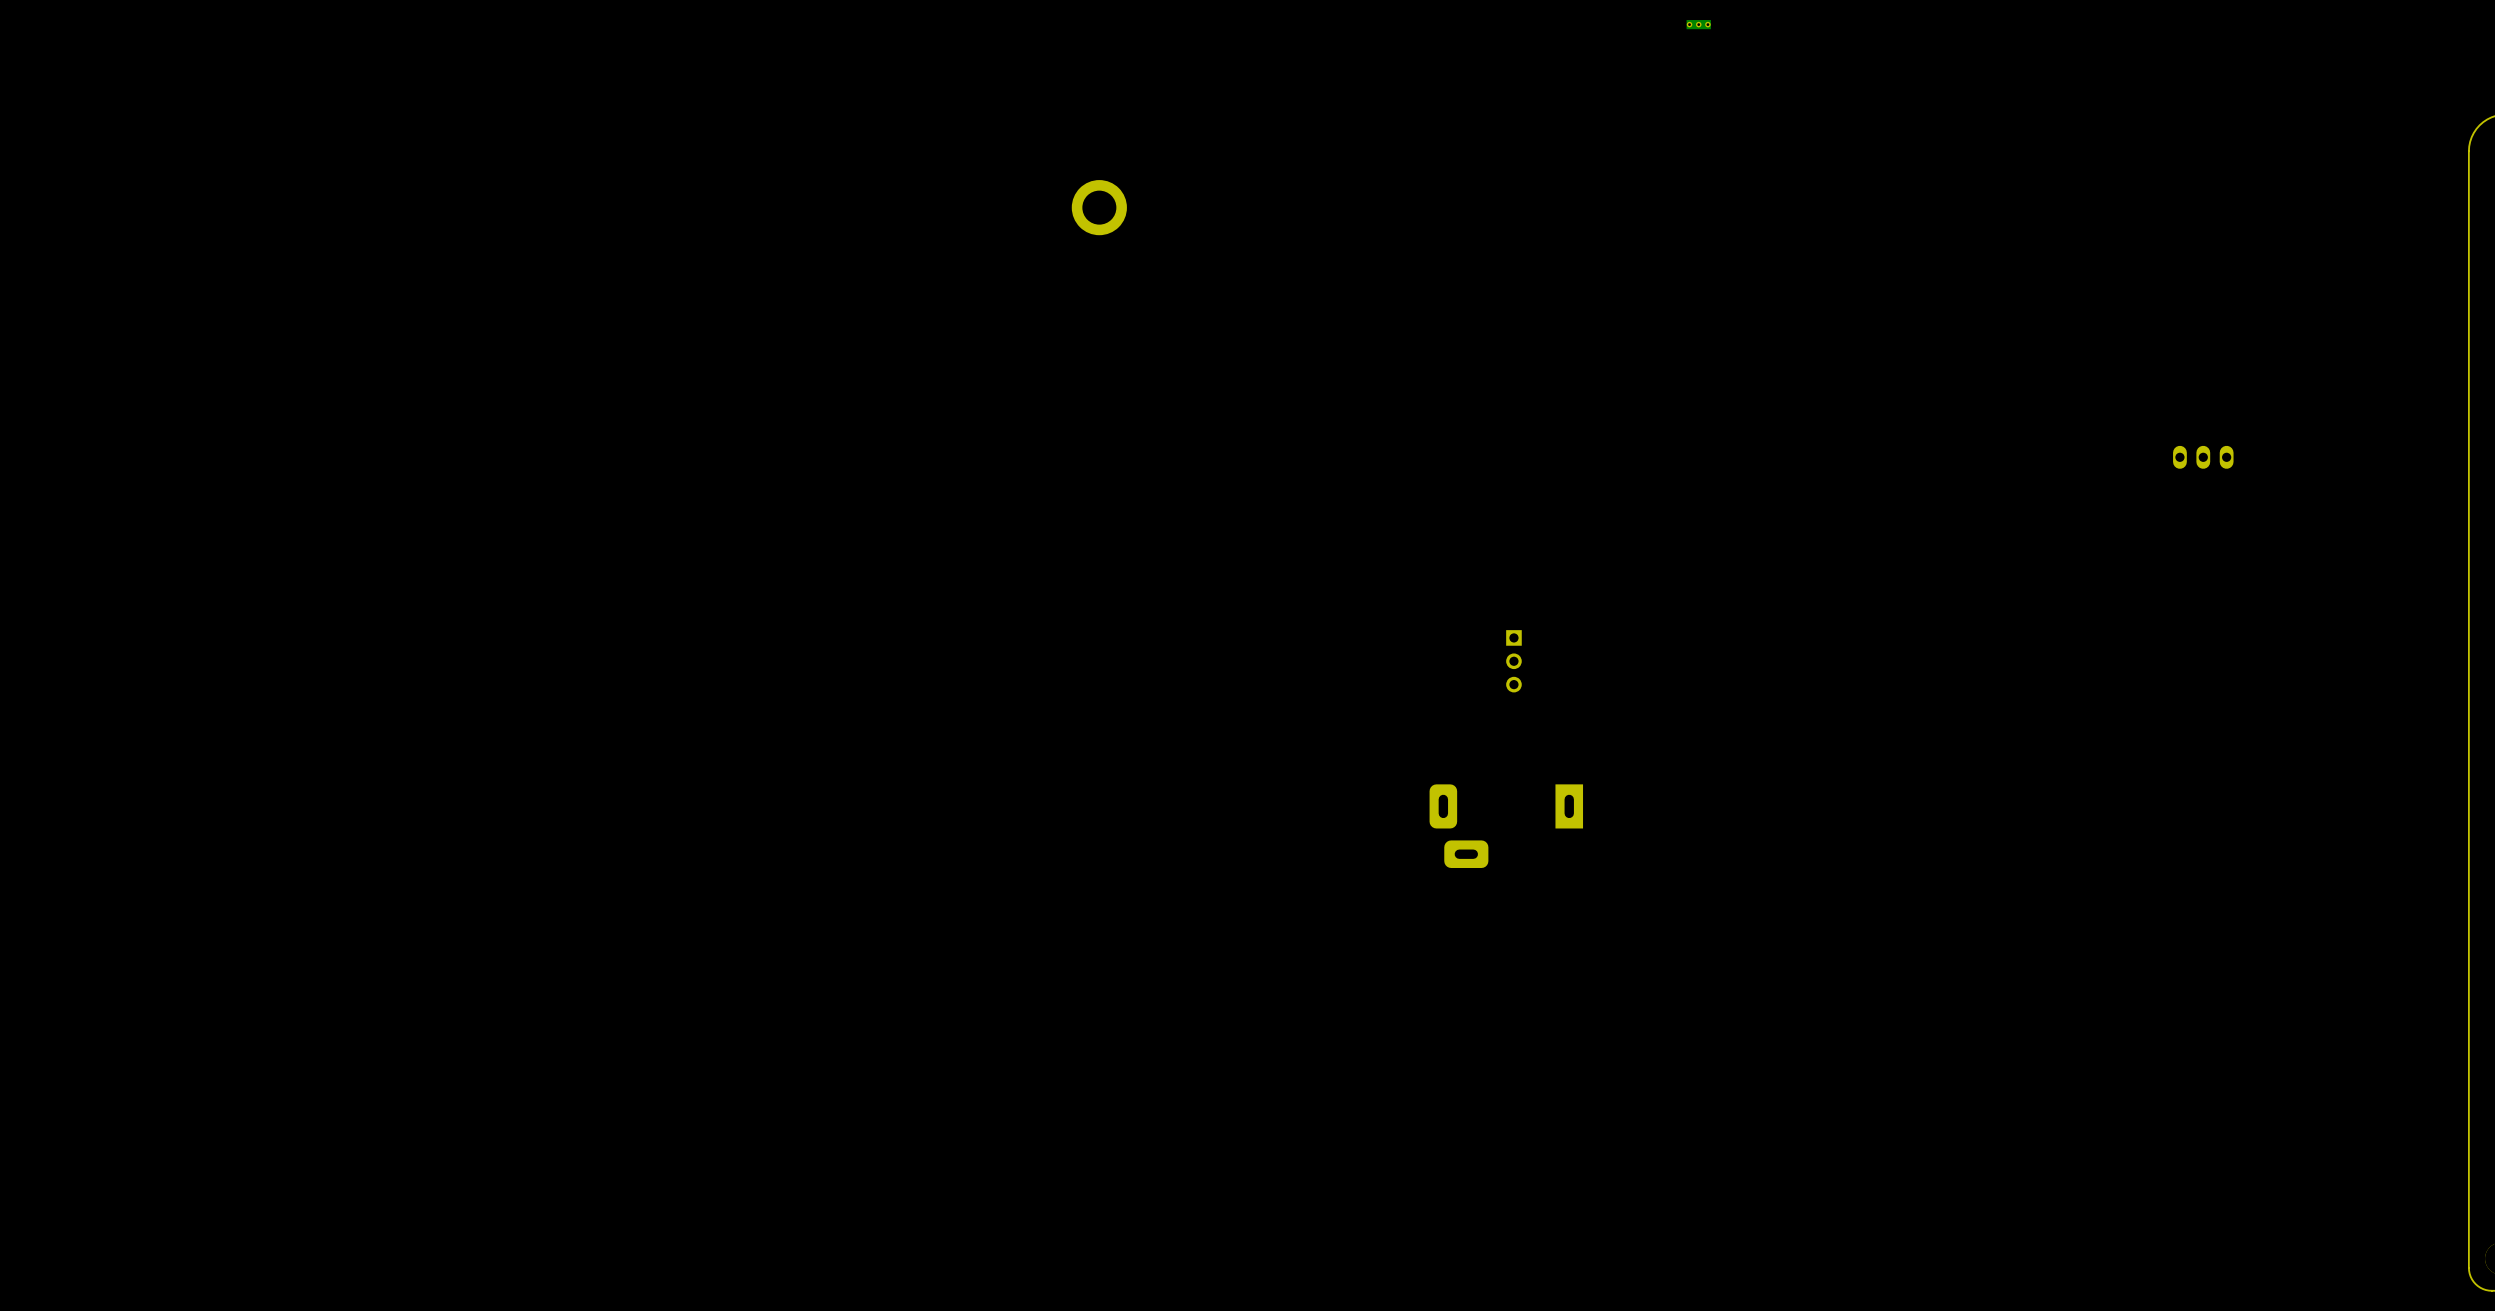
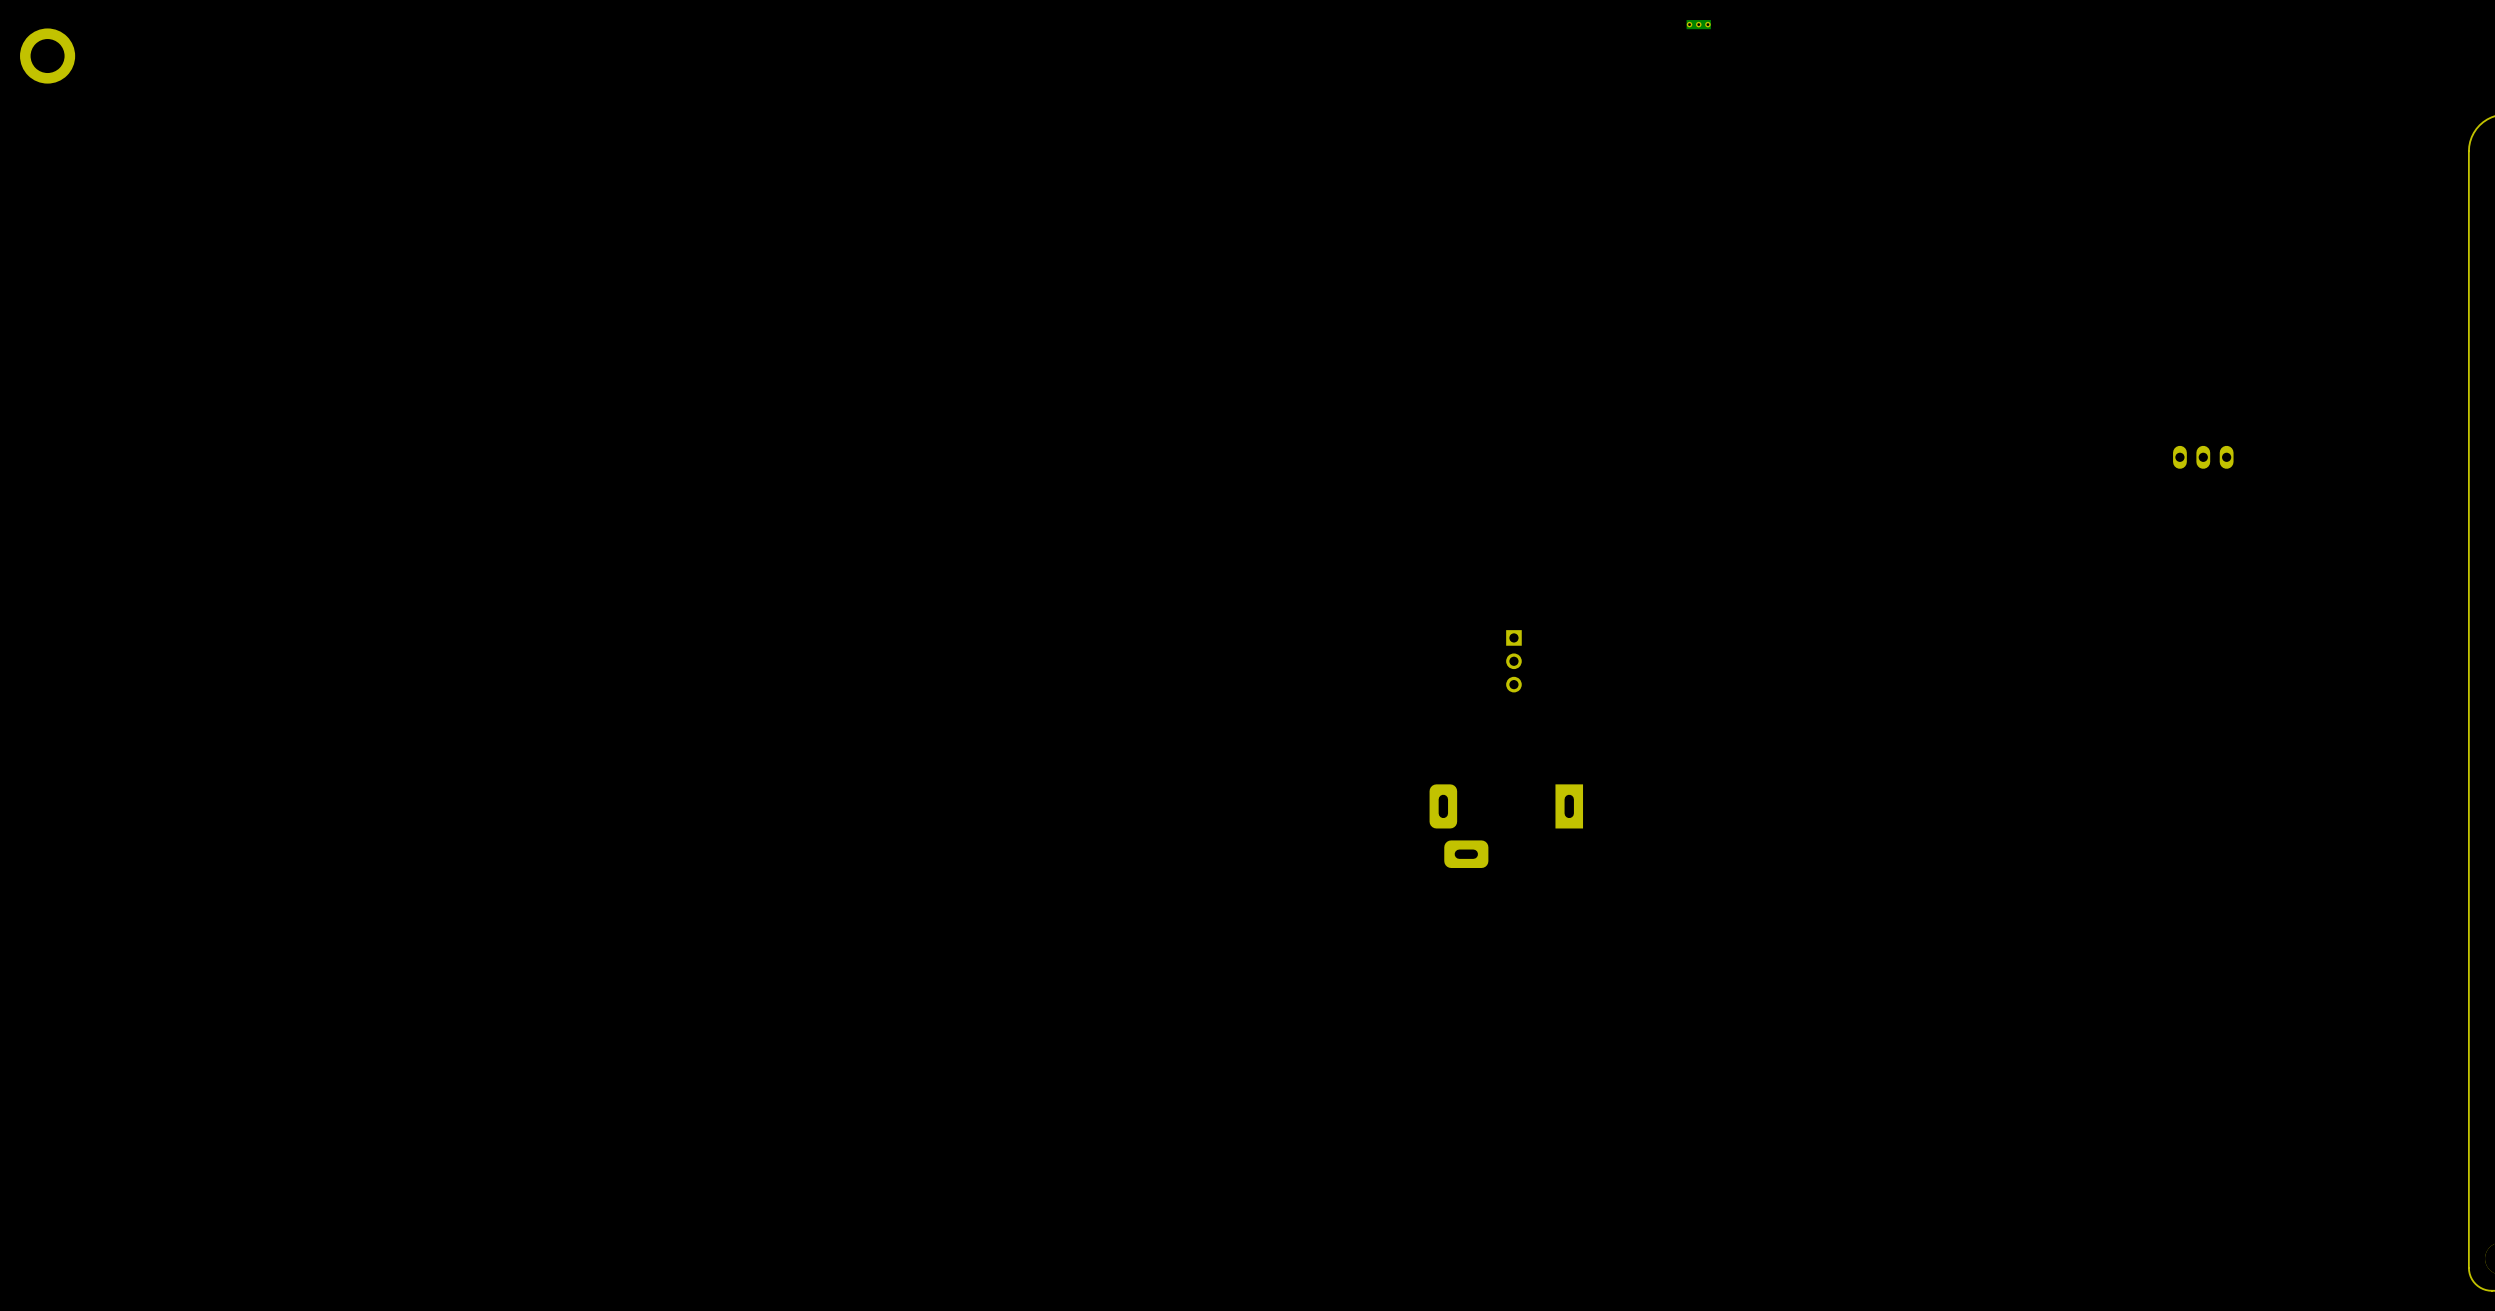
part: none -> (47, 56)
part: (1099, 207) -> none

